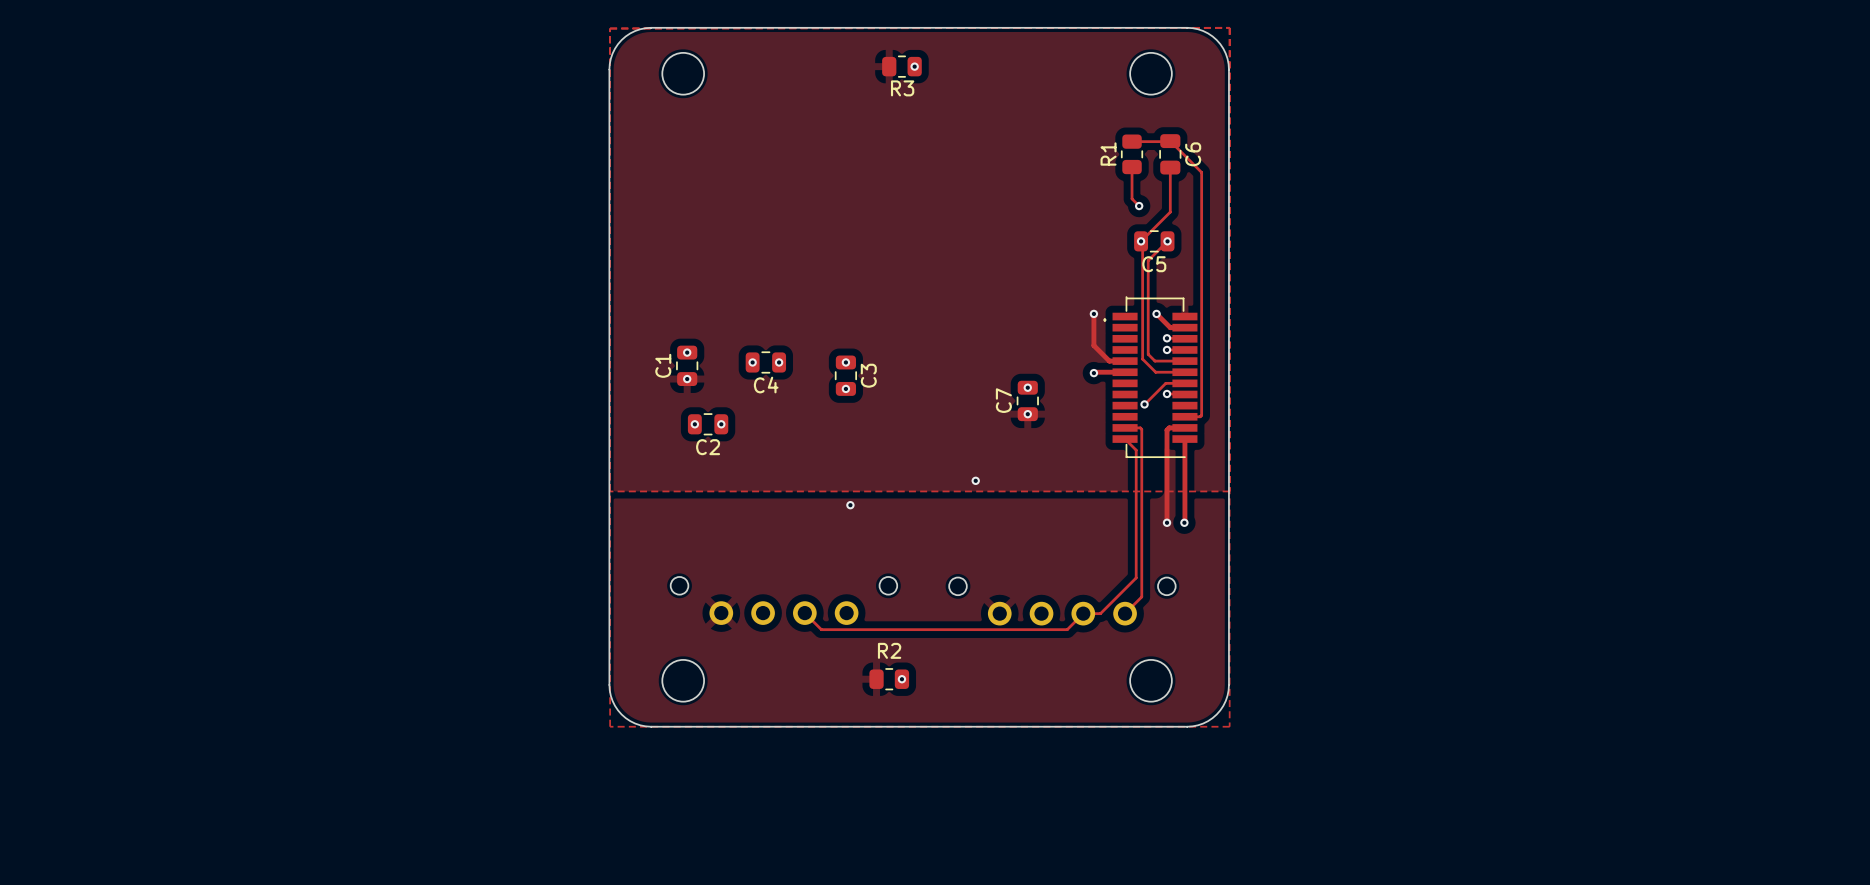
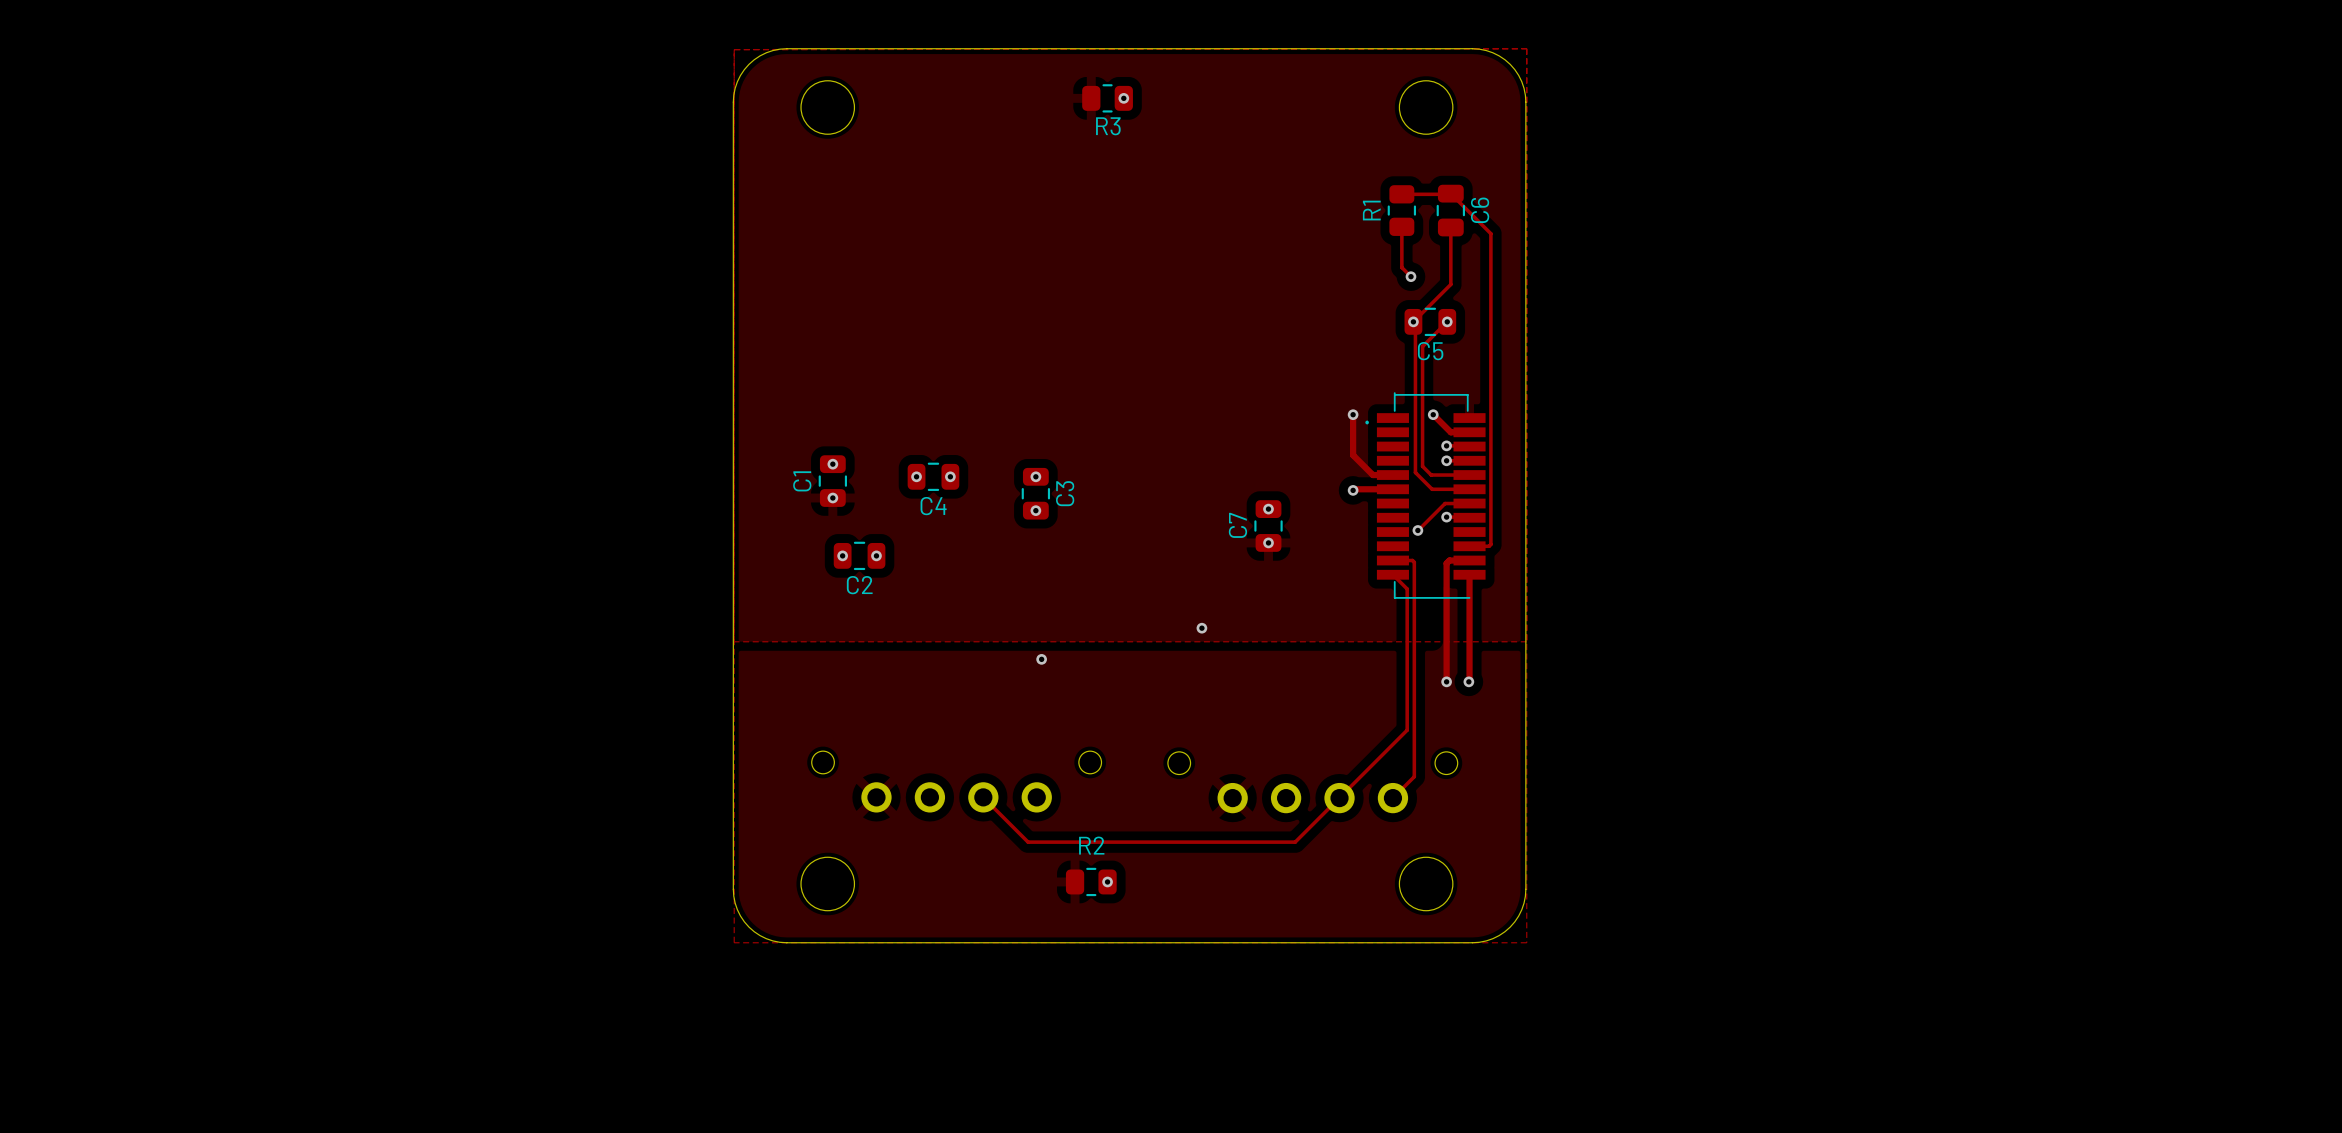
track: (1136, 560) (1136, 577) (1100, 613) (1083, 613) (1067, 629) (821, 629) -> (1339, 798) (1295, 842) (1028, 842) (1004, 818)
track: none -> (1407, 730) (1339, 797)

